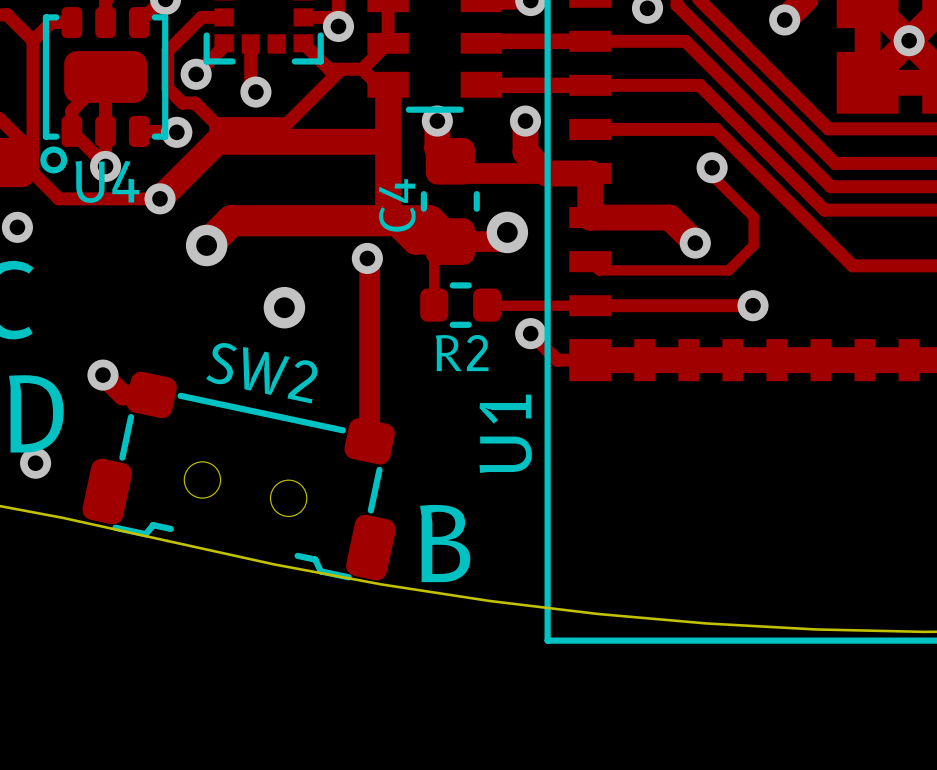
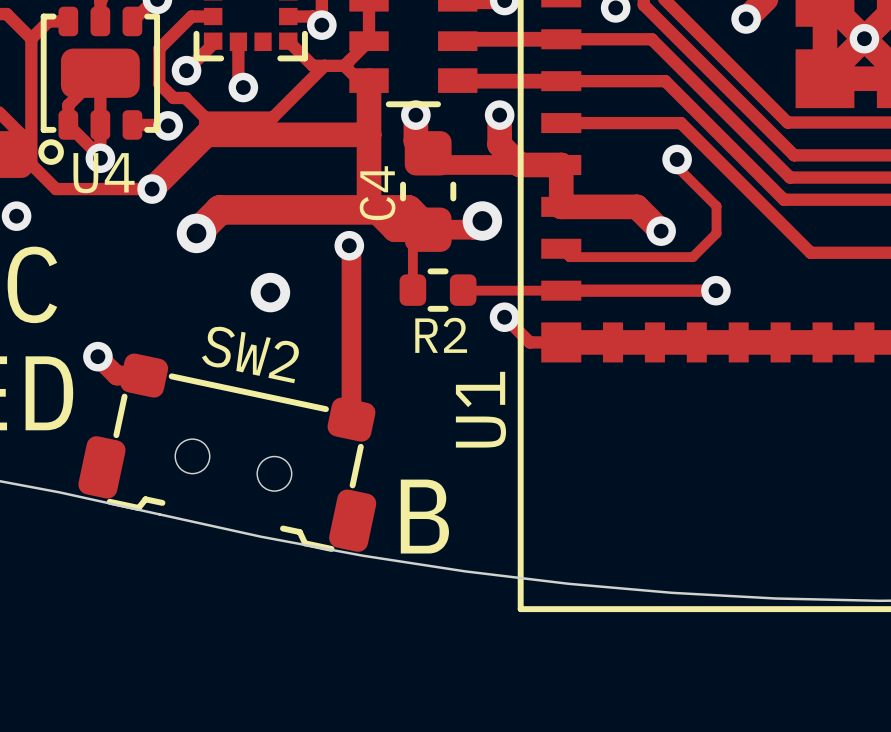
via: (35, 463) -> none

